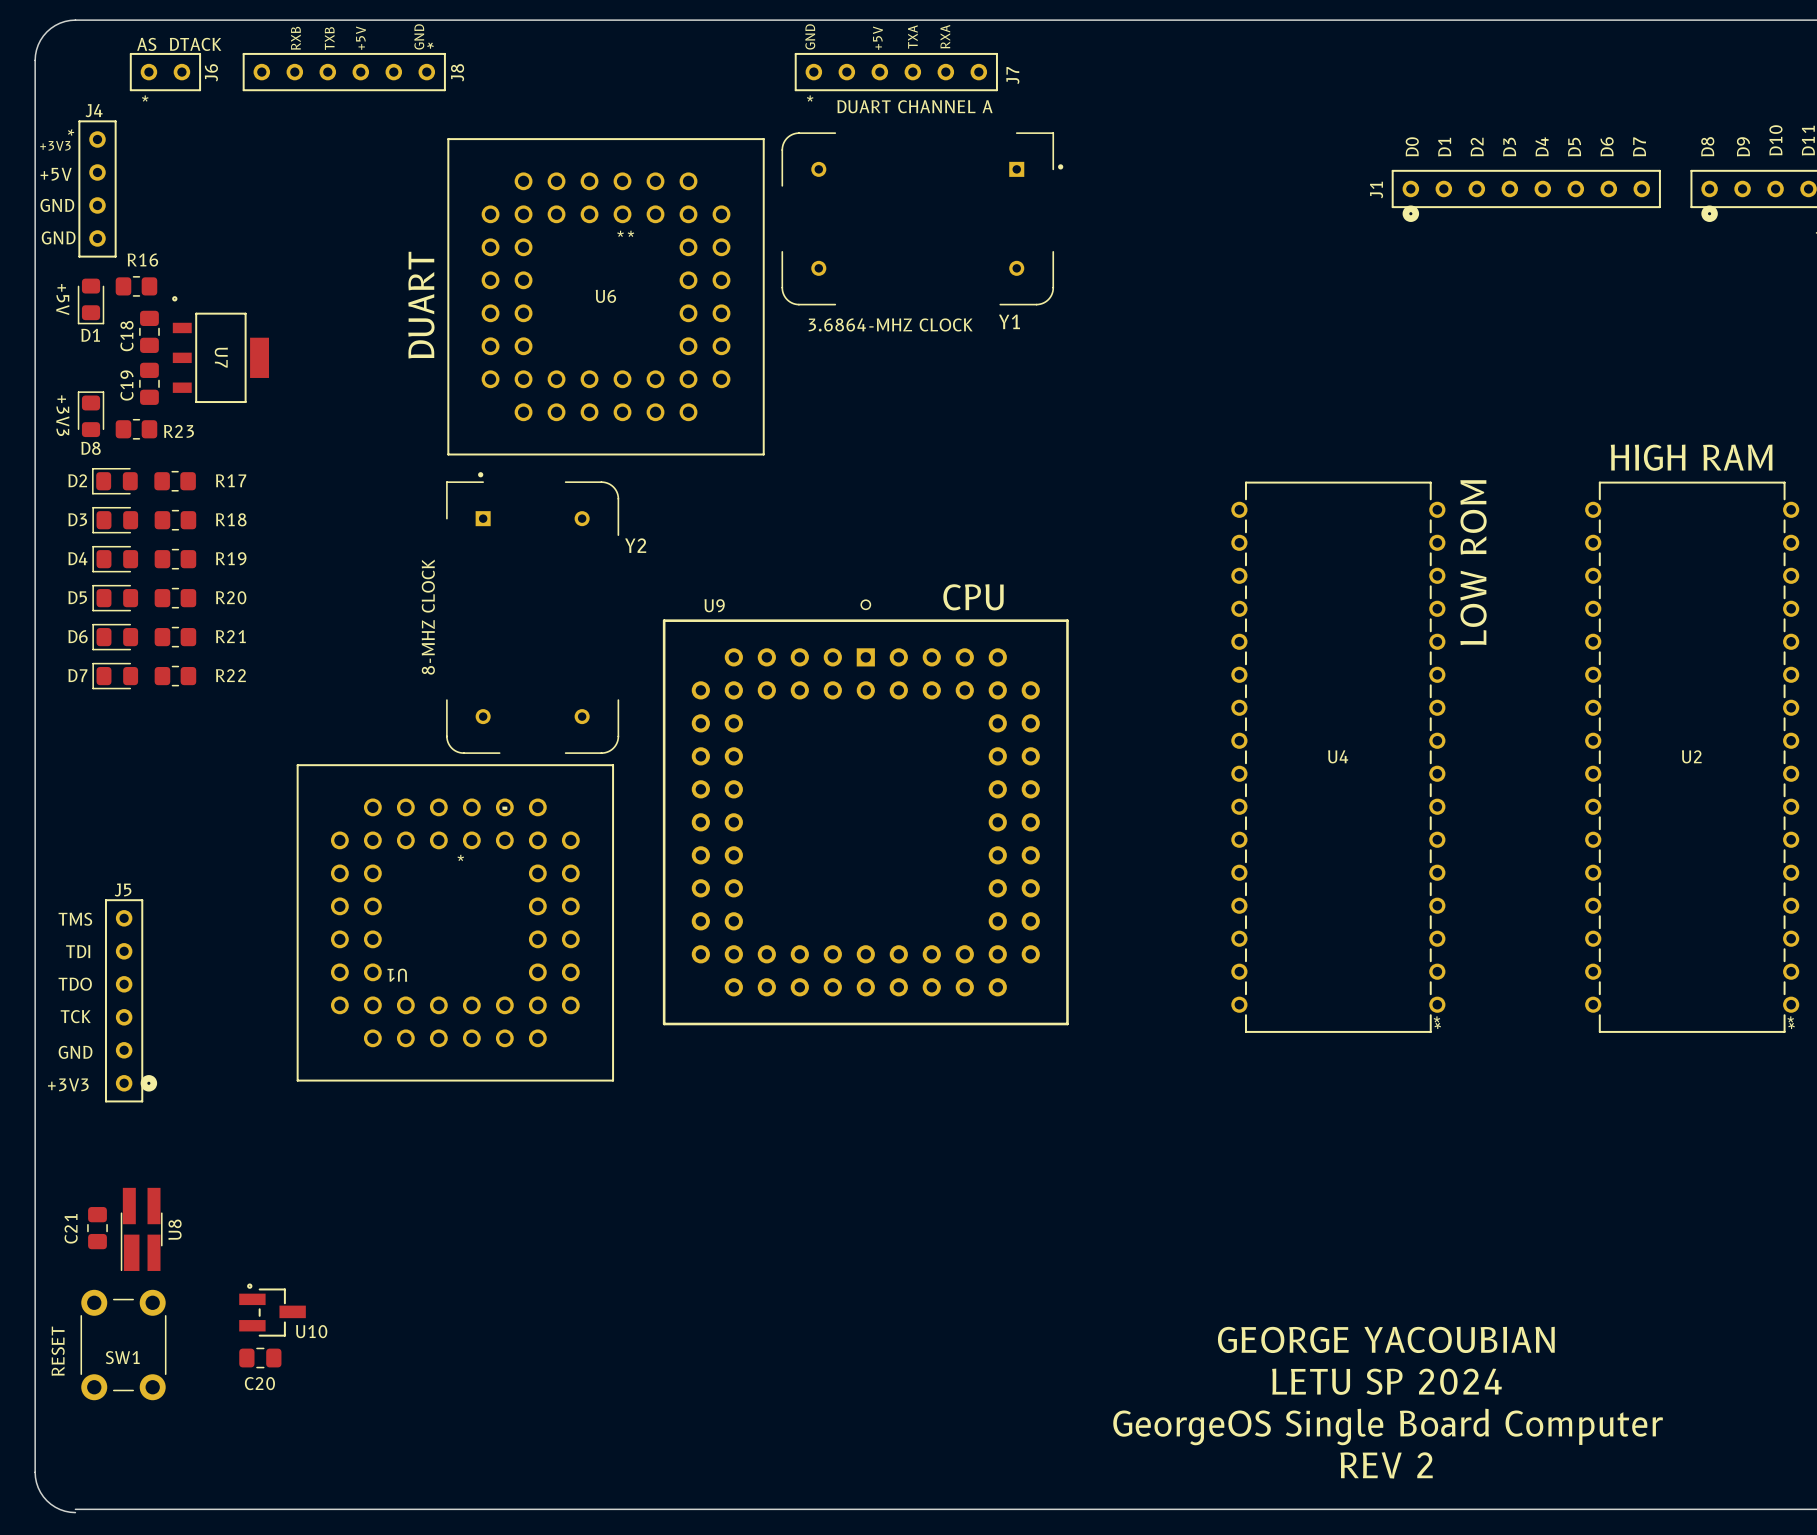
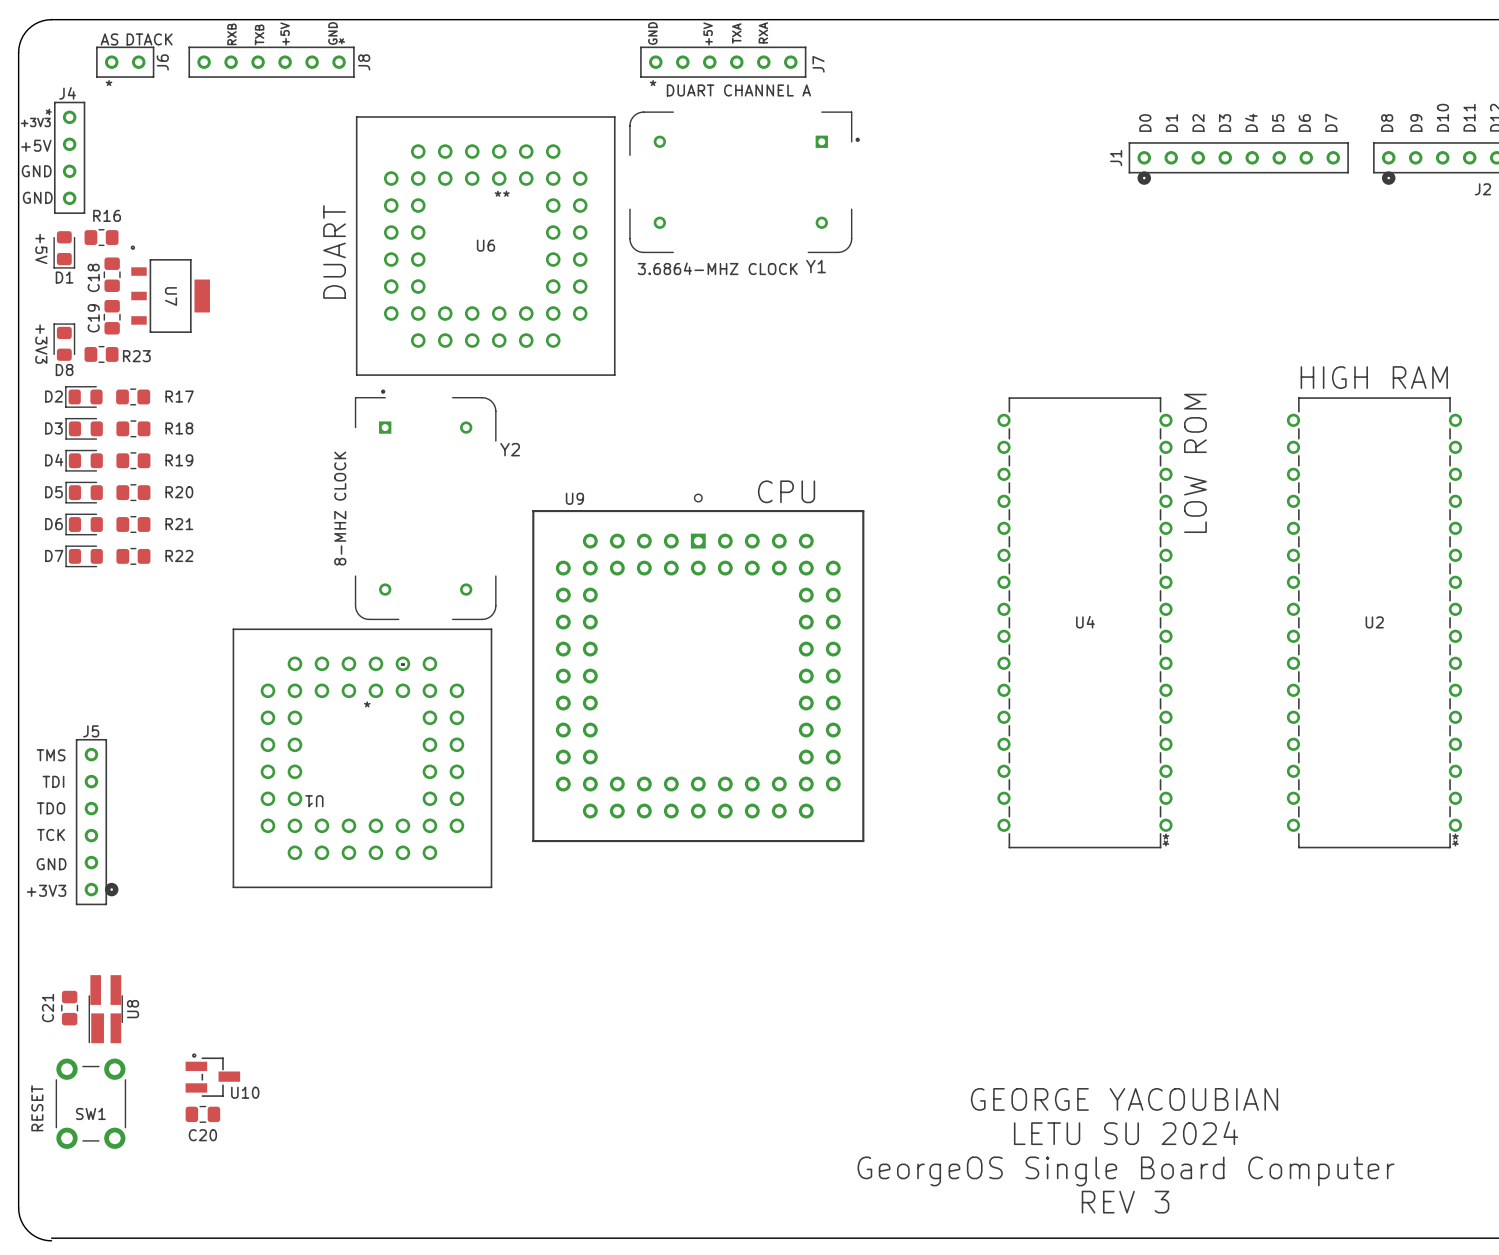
text: LETU SP 2024 (1386, 1381) -> LETU SU 2024 (1126, 1133)
text: REV 2 (1386, 1465) -> REV 3 (1125, 1202)

